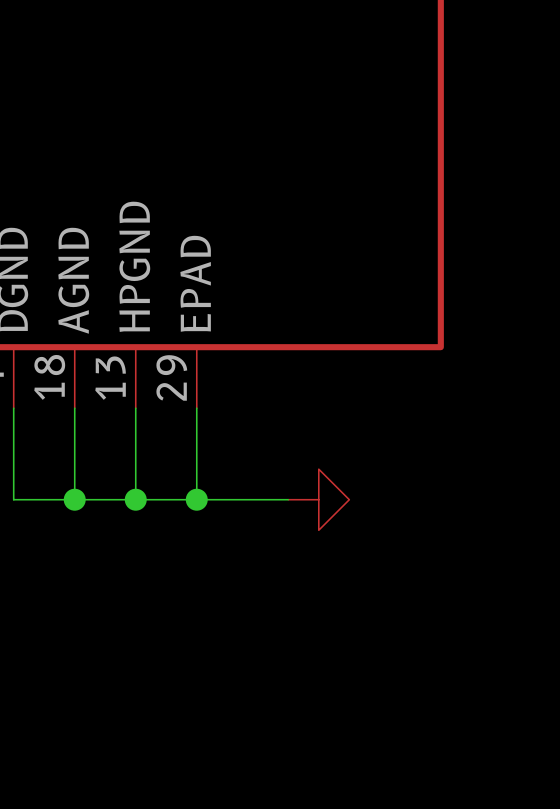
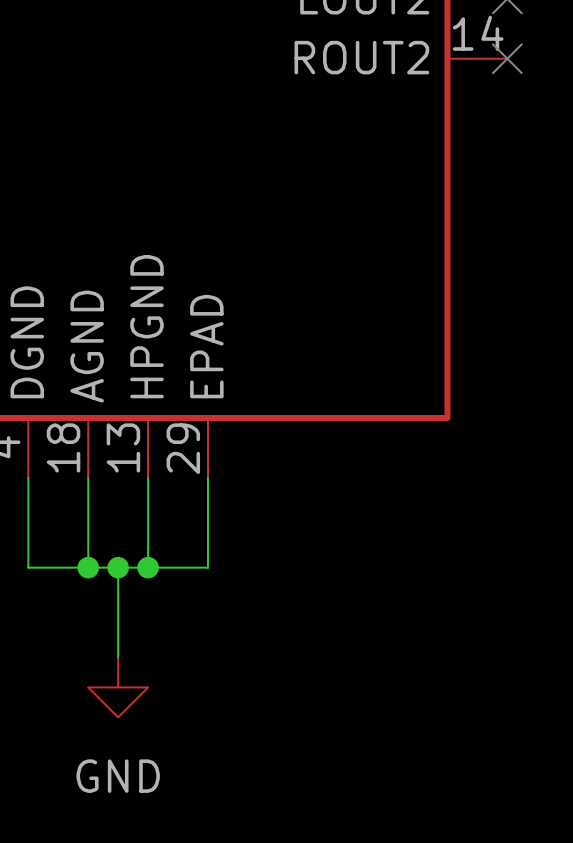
wire: none -> (118, 567) (118, 657)
wire: (196, 499) (288, 499) -> none
junction position: (196, 499) -> (118, 567)
power symbol: (318, 499) -> none
power symbol: none -> GND (118, 687)

